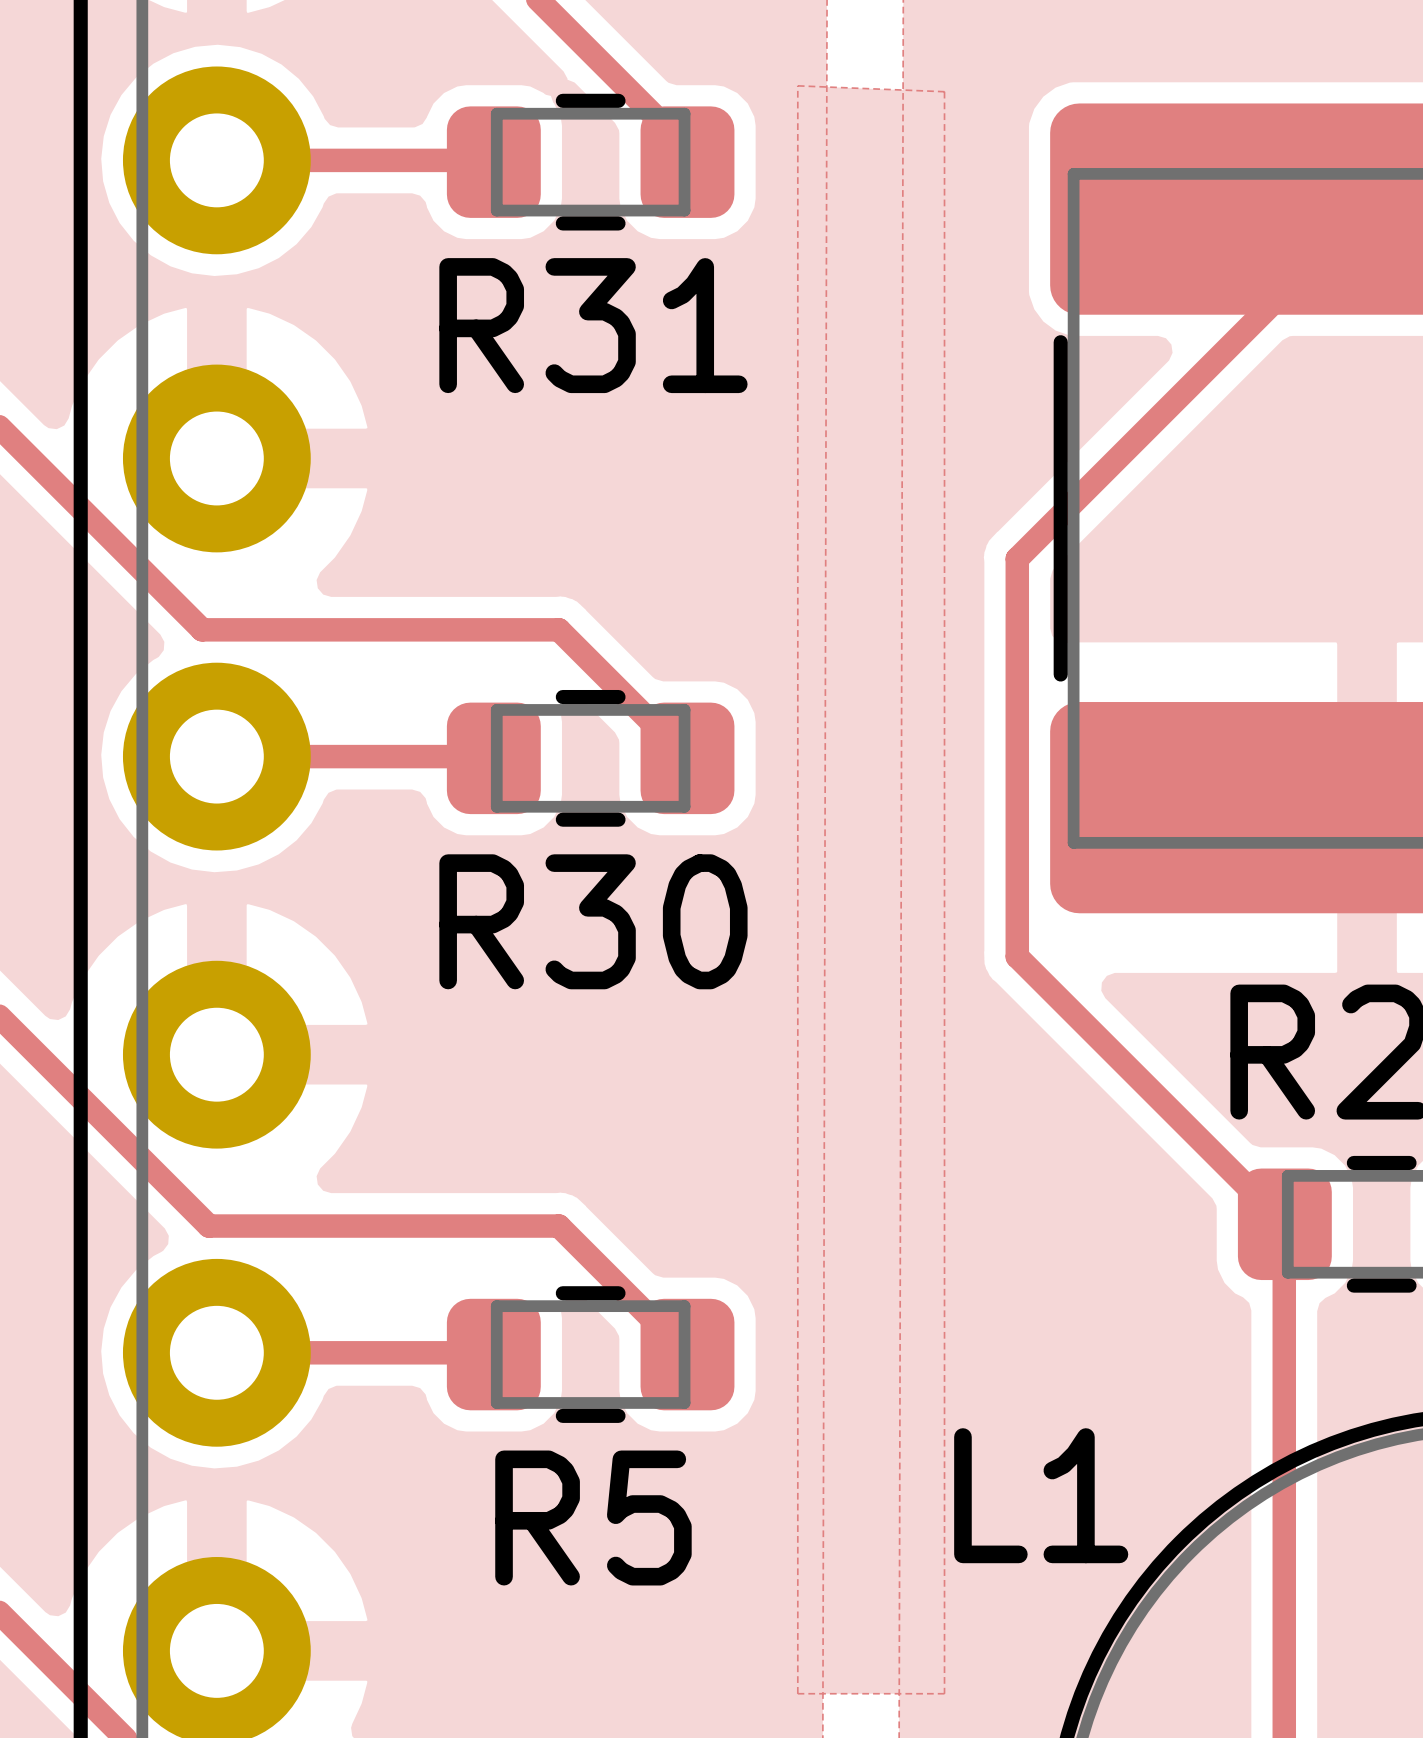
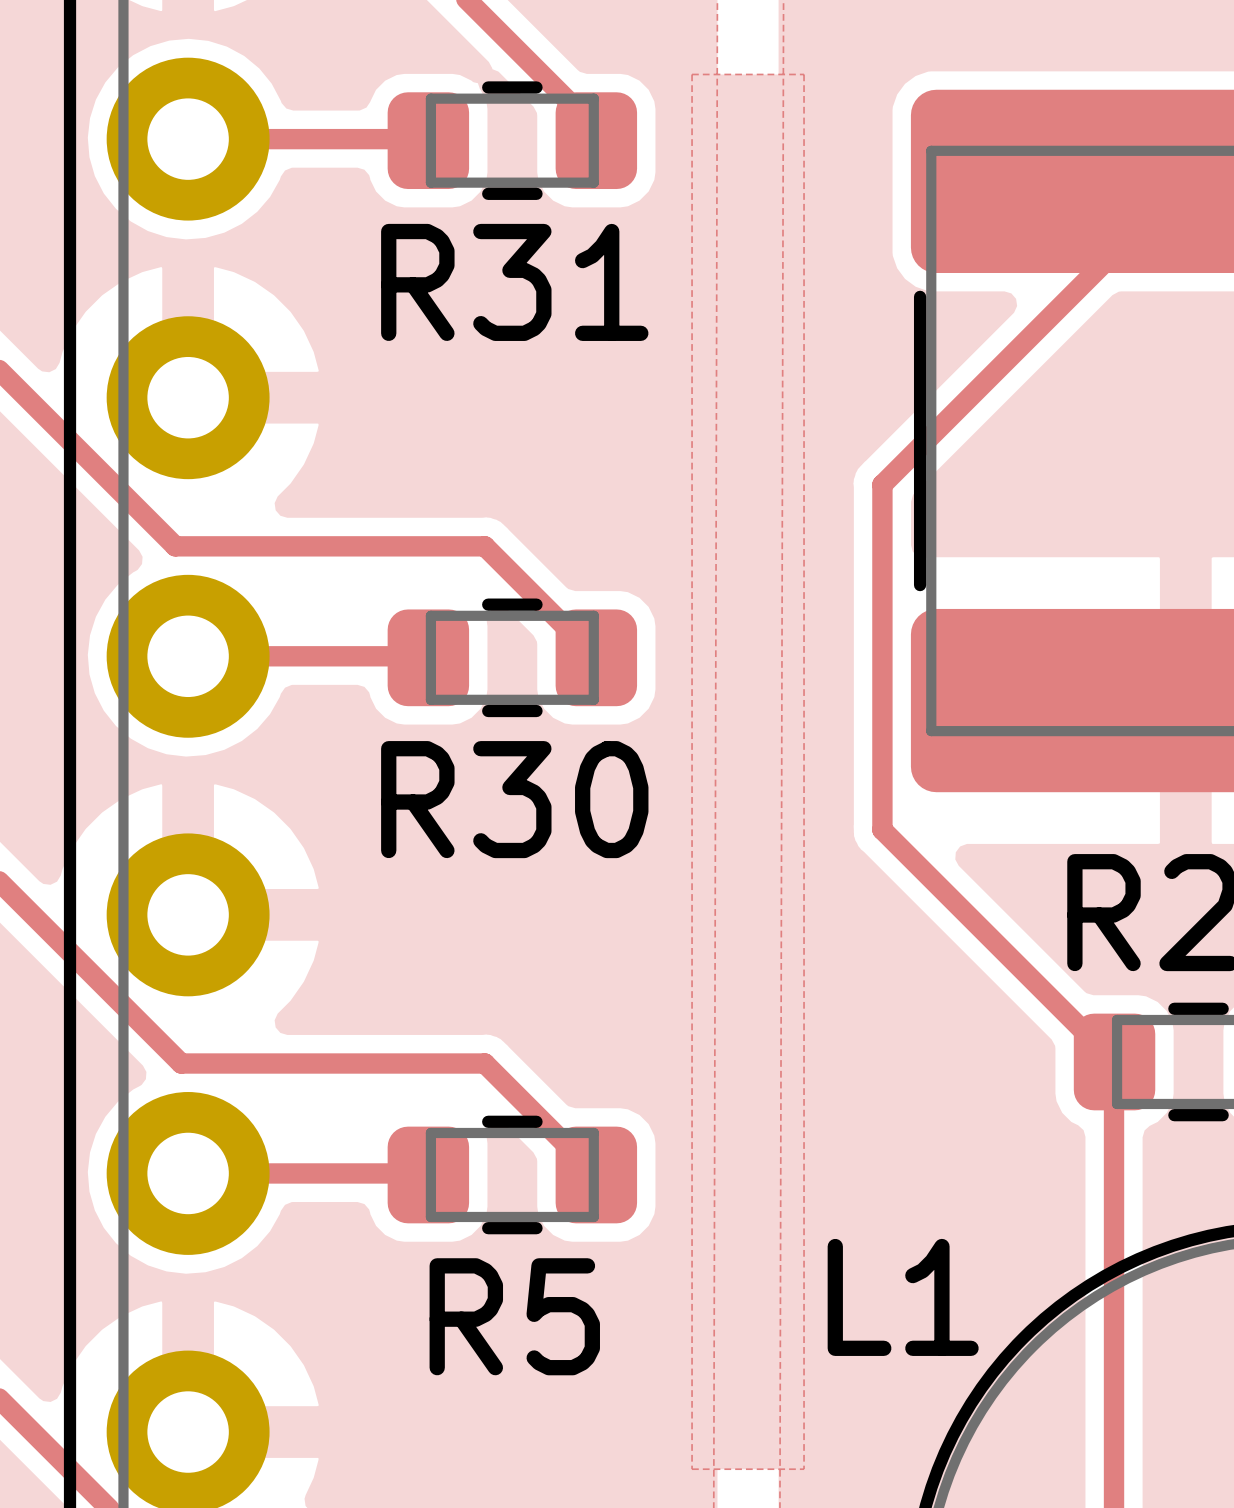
zone outline: (797, 85) (944, 91) (944, 1693) (926, 1693) -> (692, 74) (804, 74) (804, 1469)

